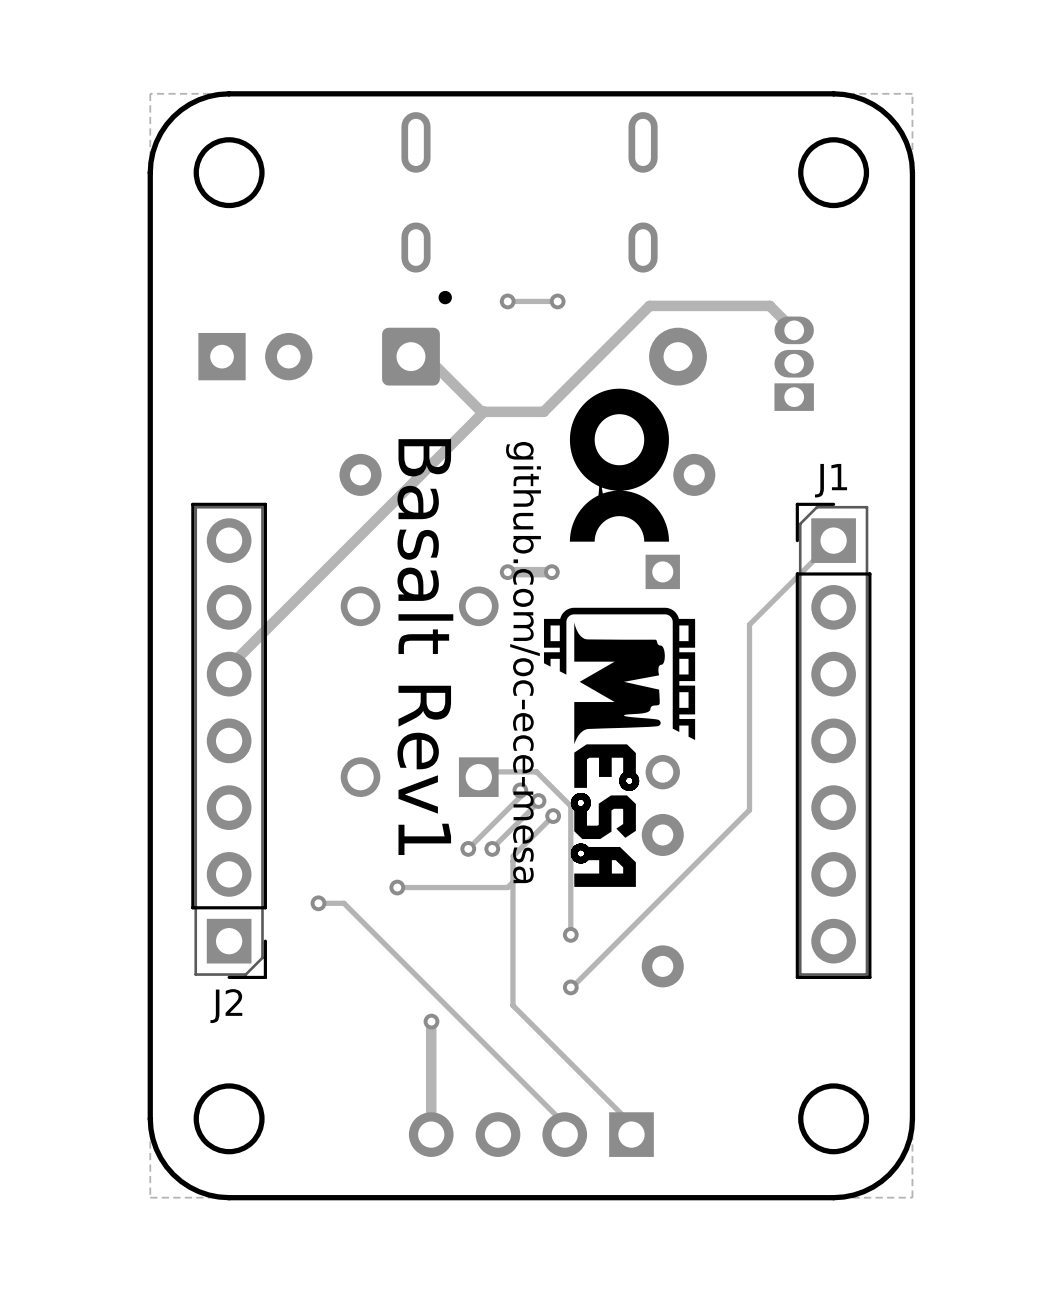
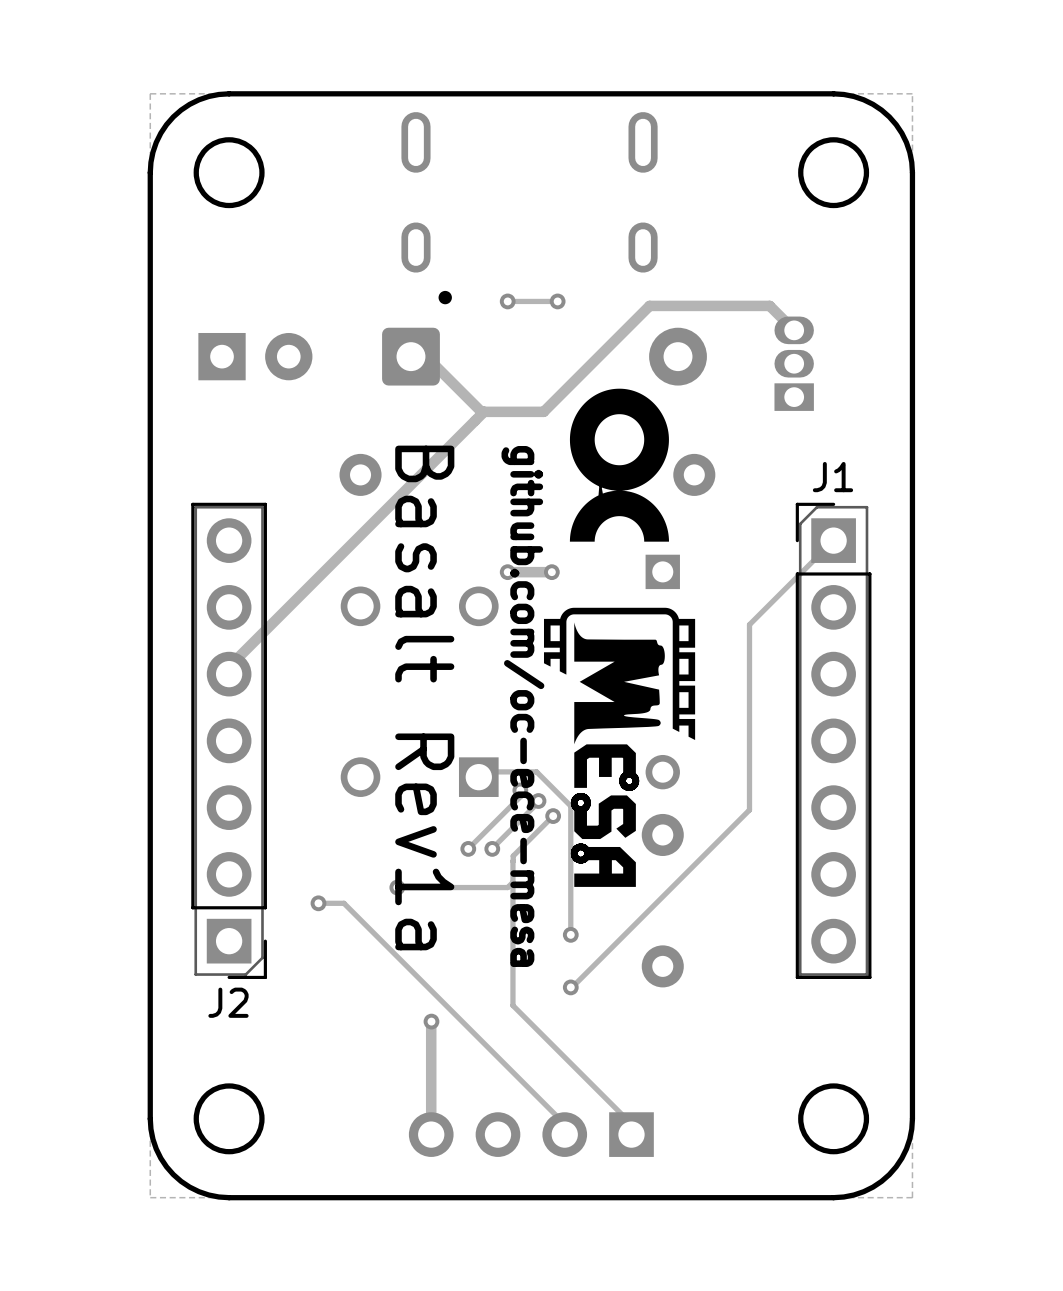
text: Basalt Rev1 (425, 647) -> Basalt Rev1a (424, 697)

